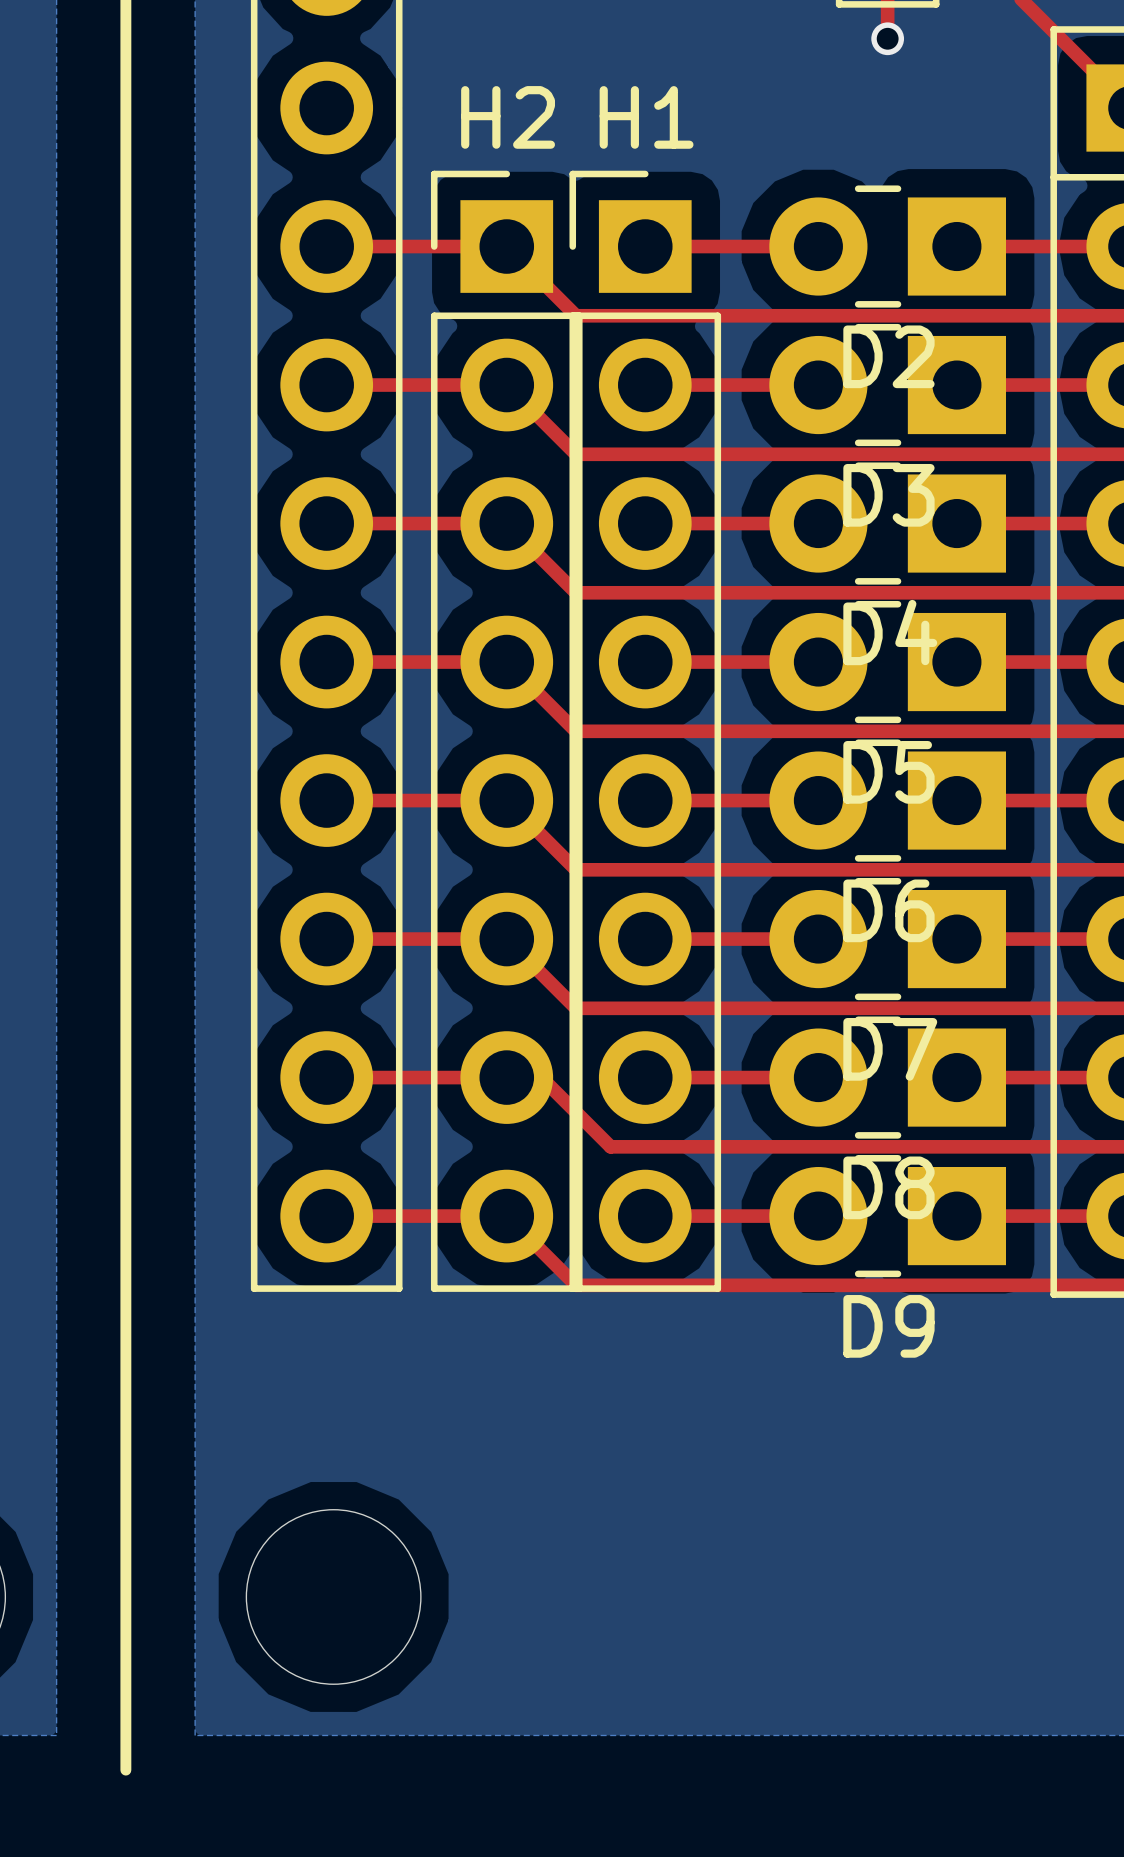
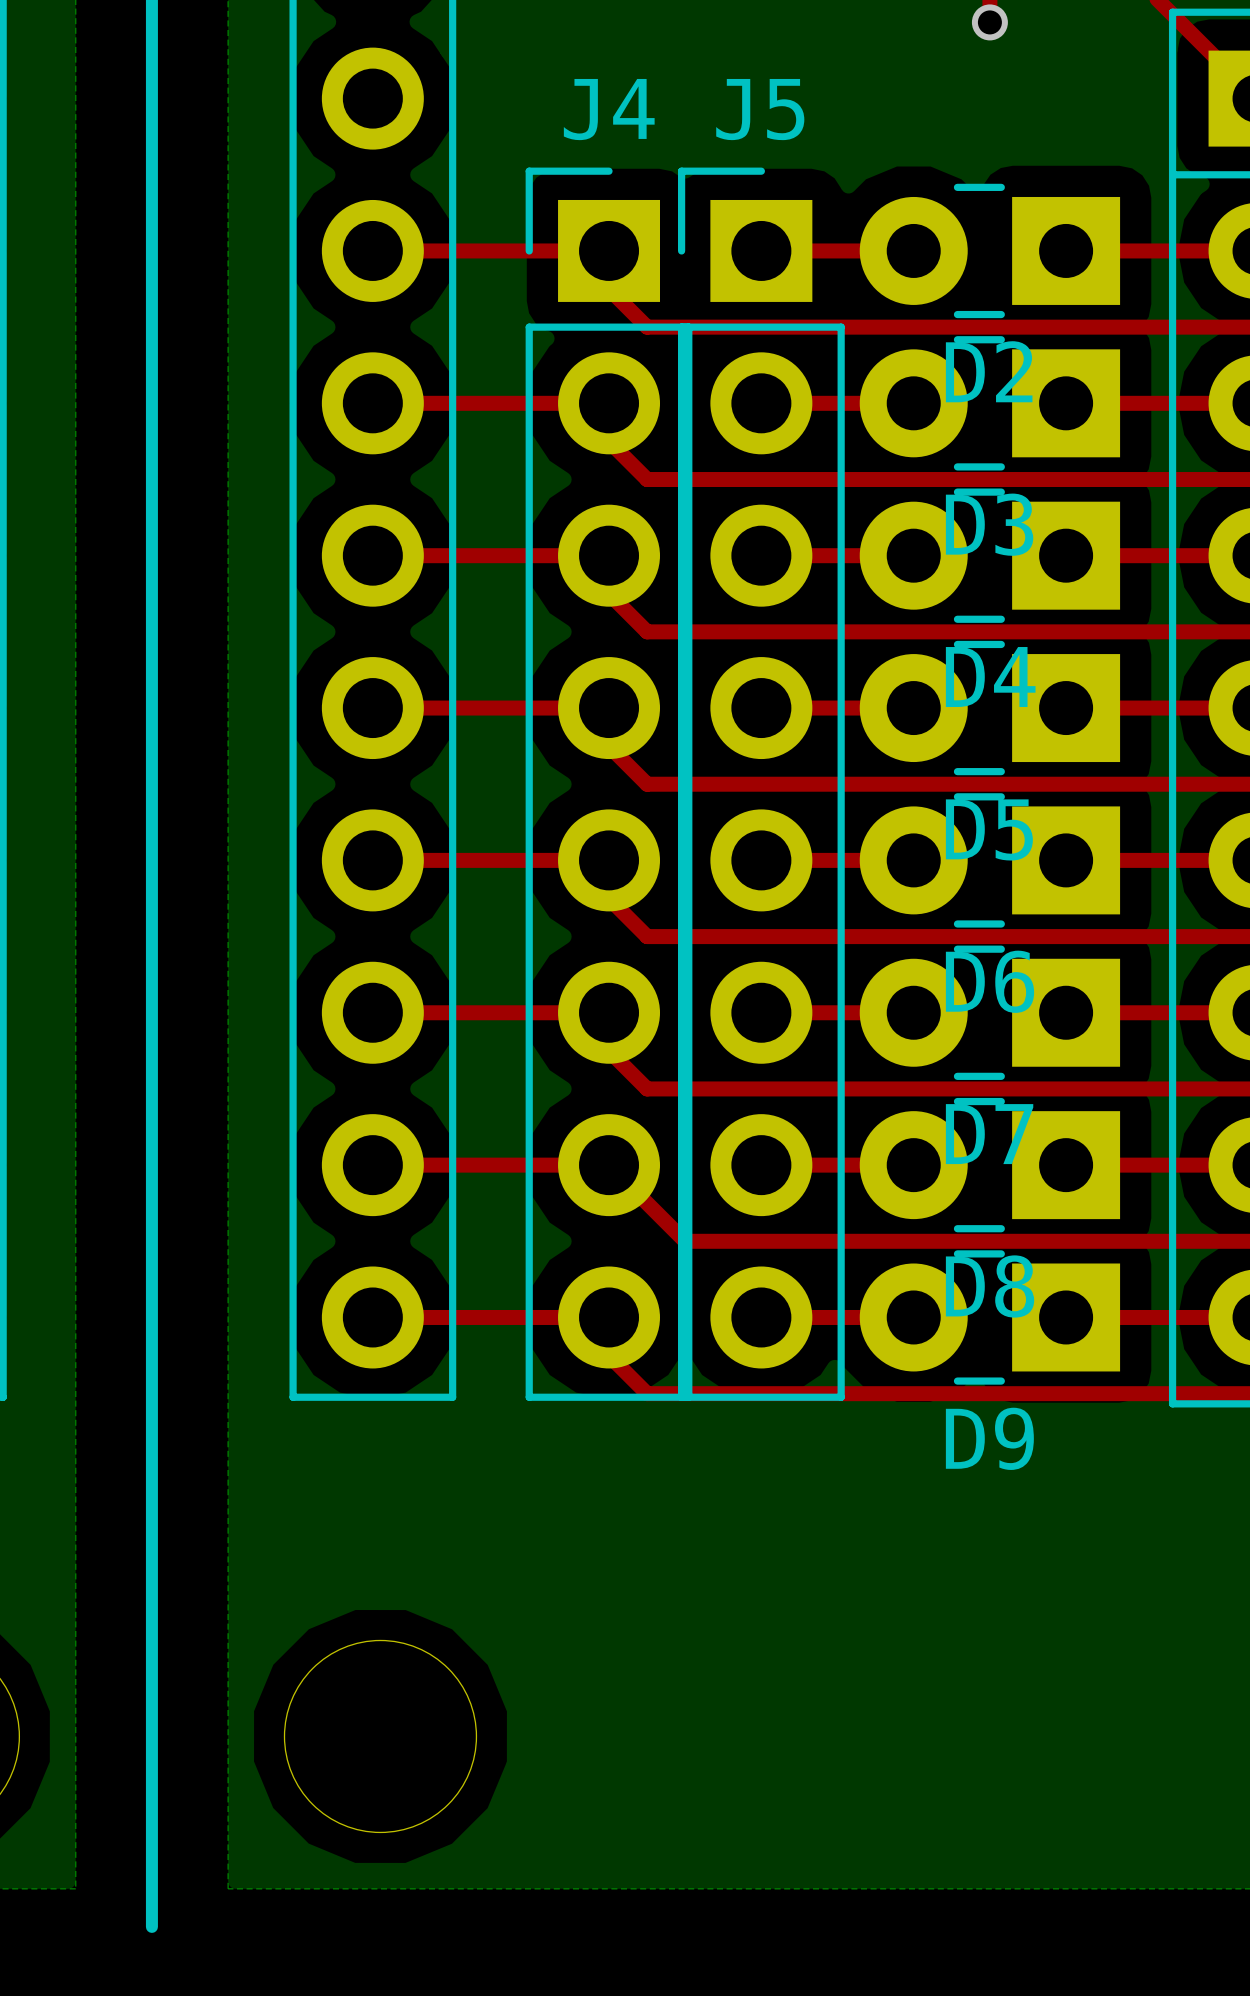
H2 name: H2 (508, 117) -> J4 (609, 109)
H1 name: H1 (646, 117) -> J5 (760, 109)
H2 position: (506, 731) -> (609, 784)
H1 position: (645, 731) -> (761, 784)

